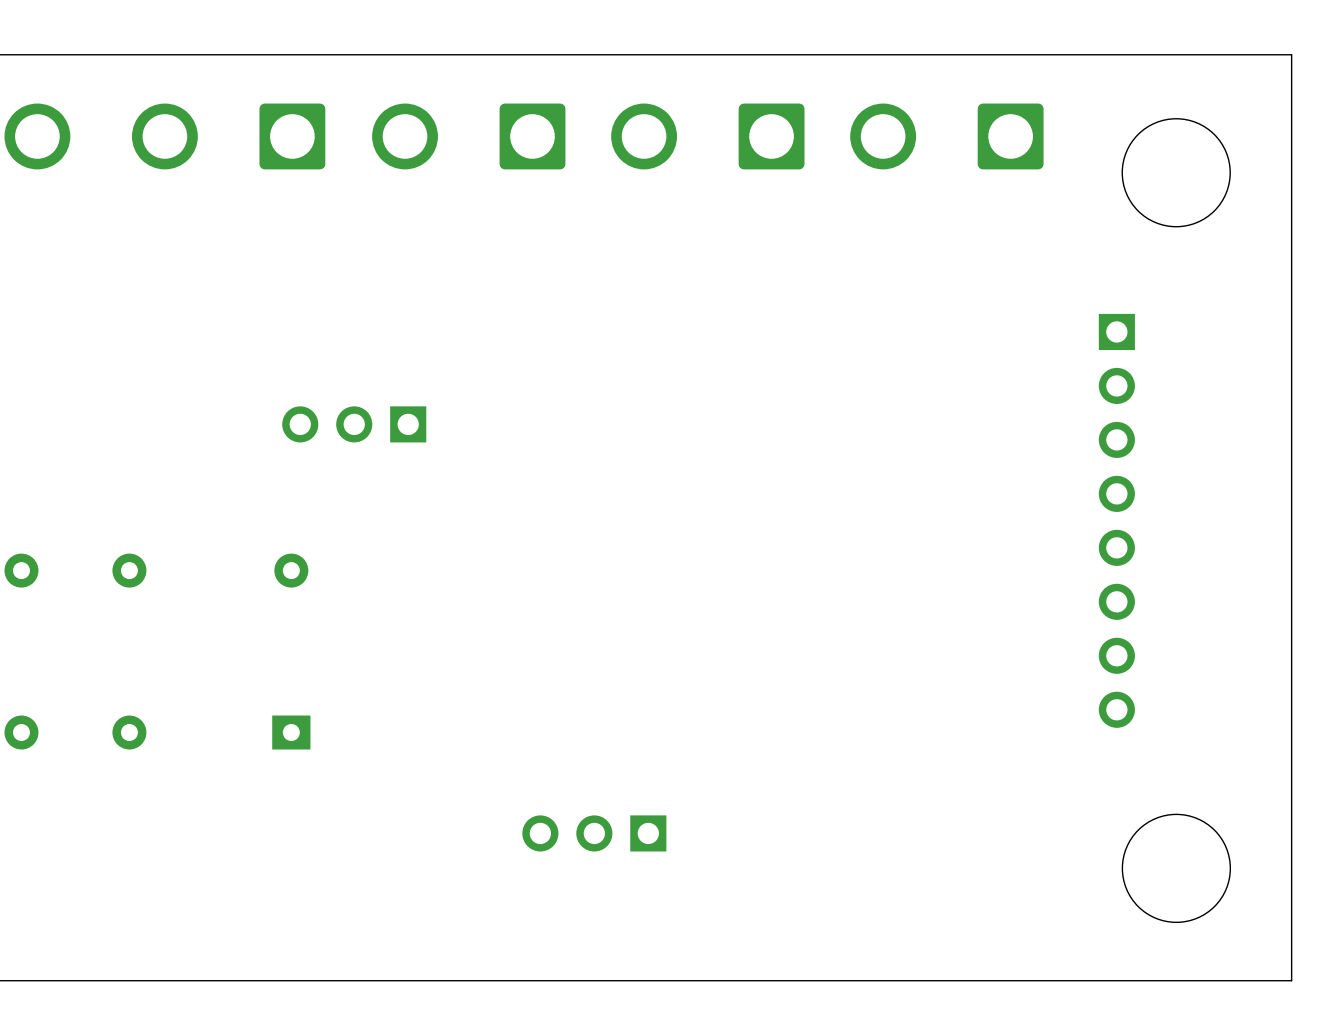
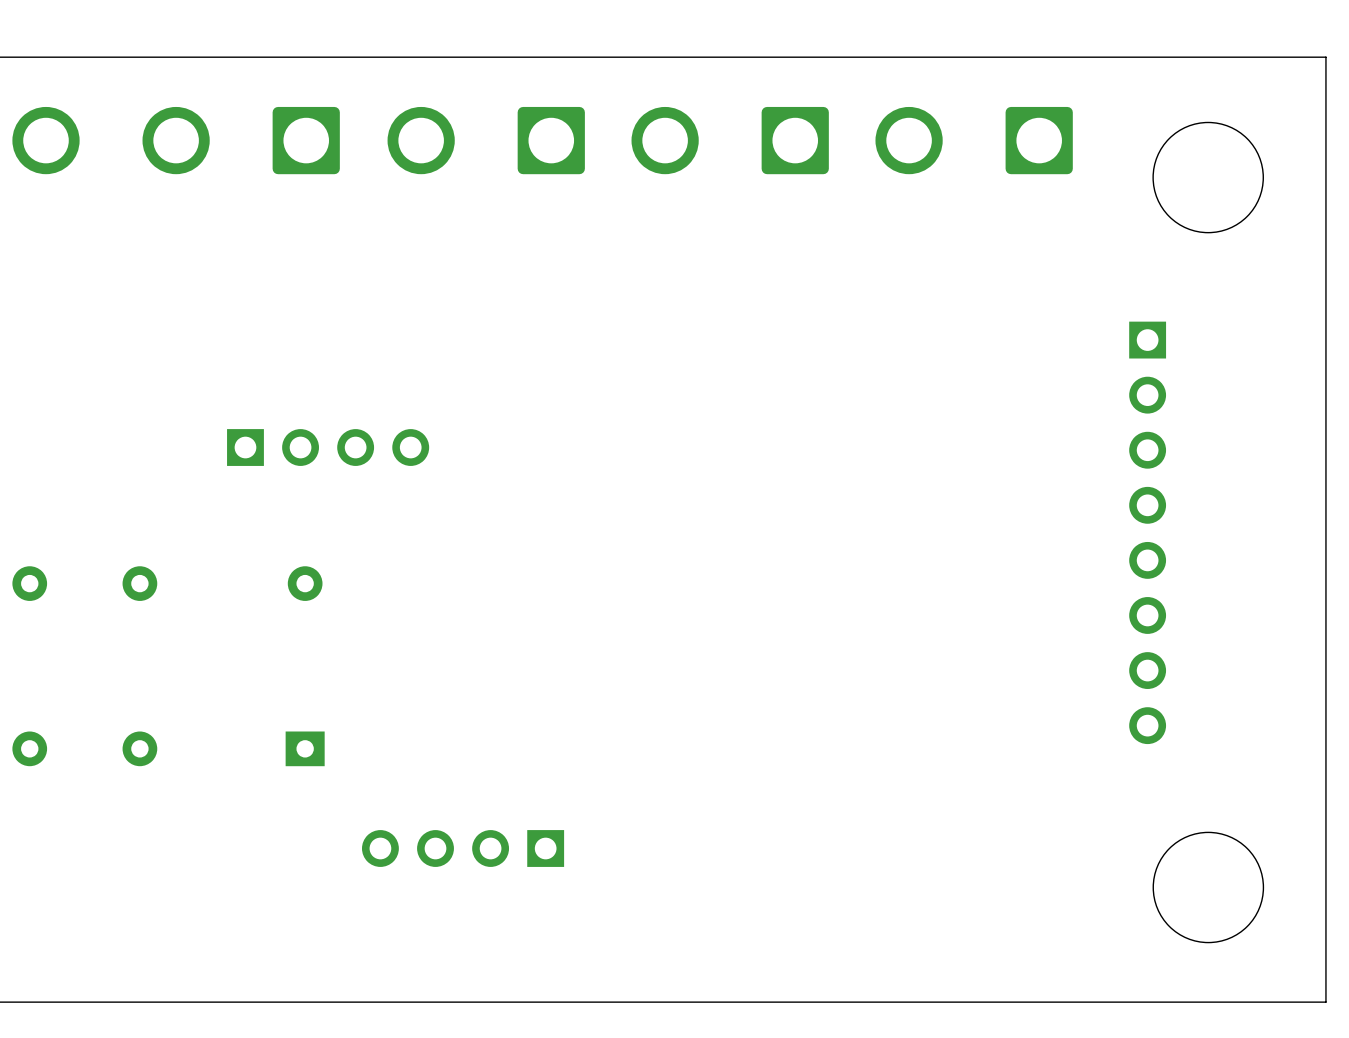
part: (354, 424) -> none
part: none -> (328, 447)
part: none -> (463, 848)
part: (594, 833) -> none

